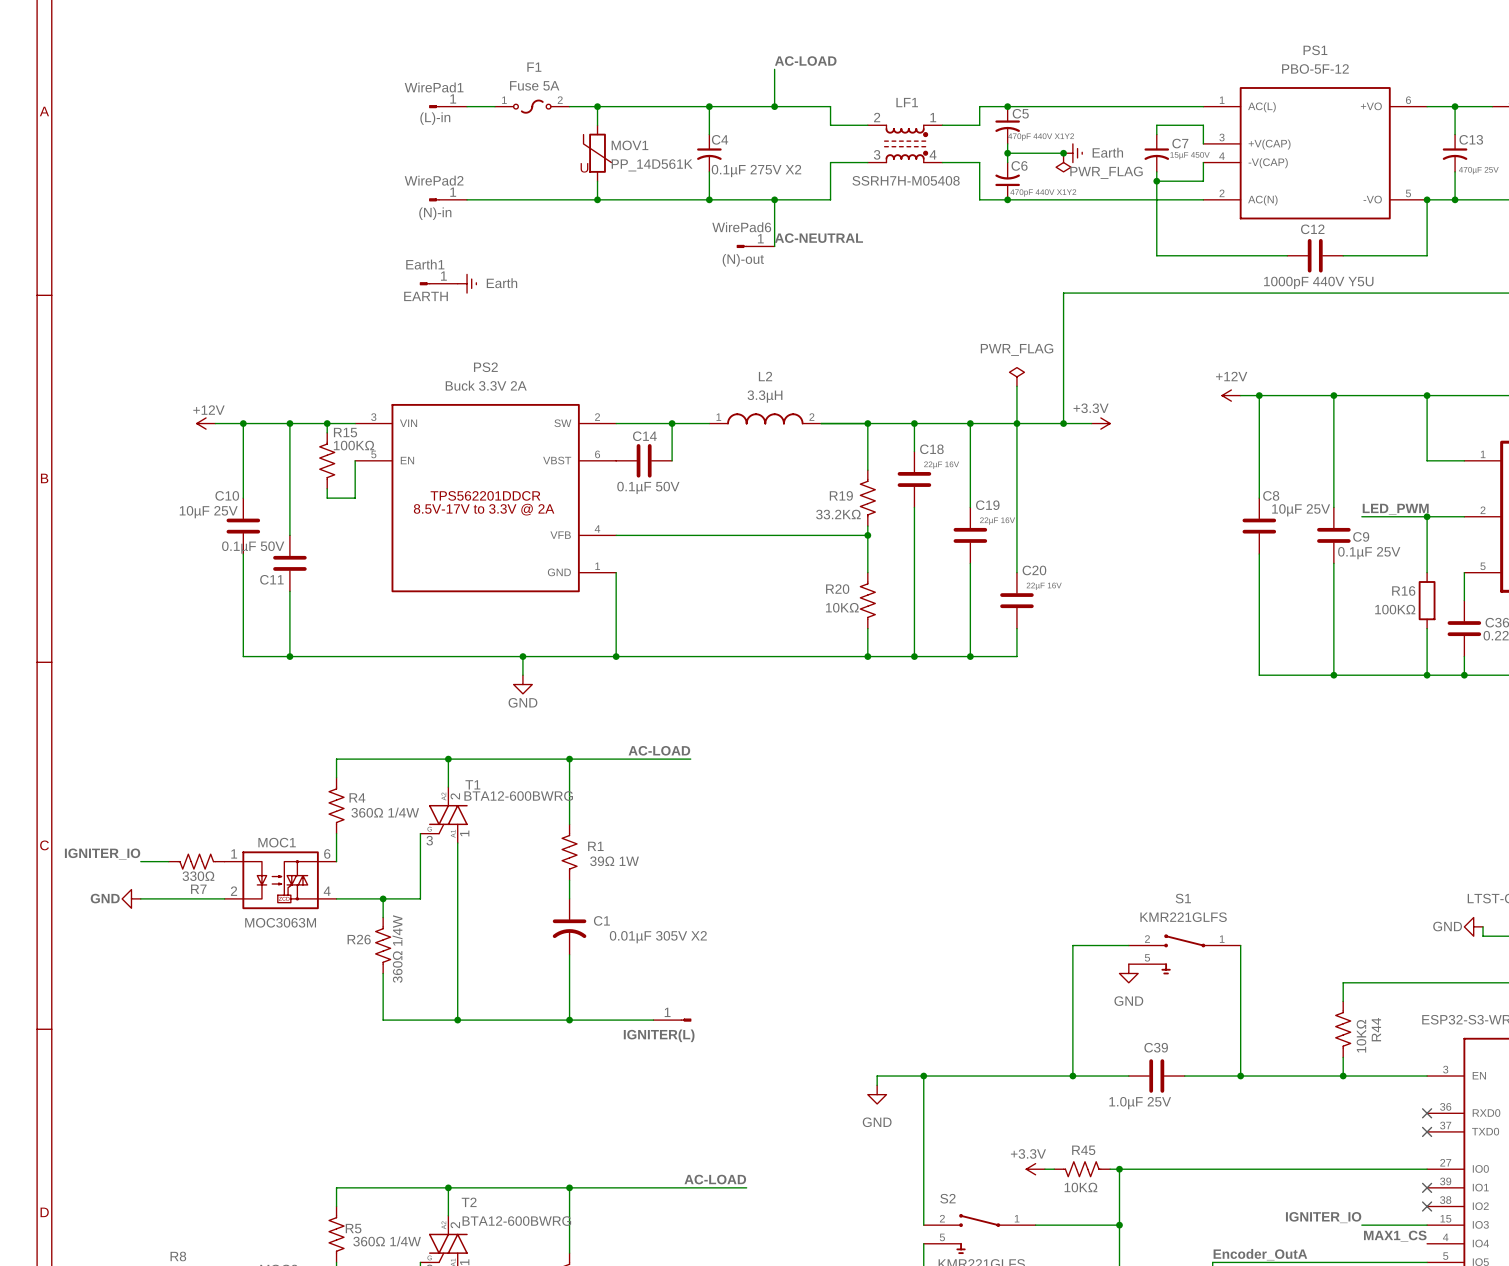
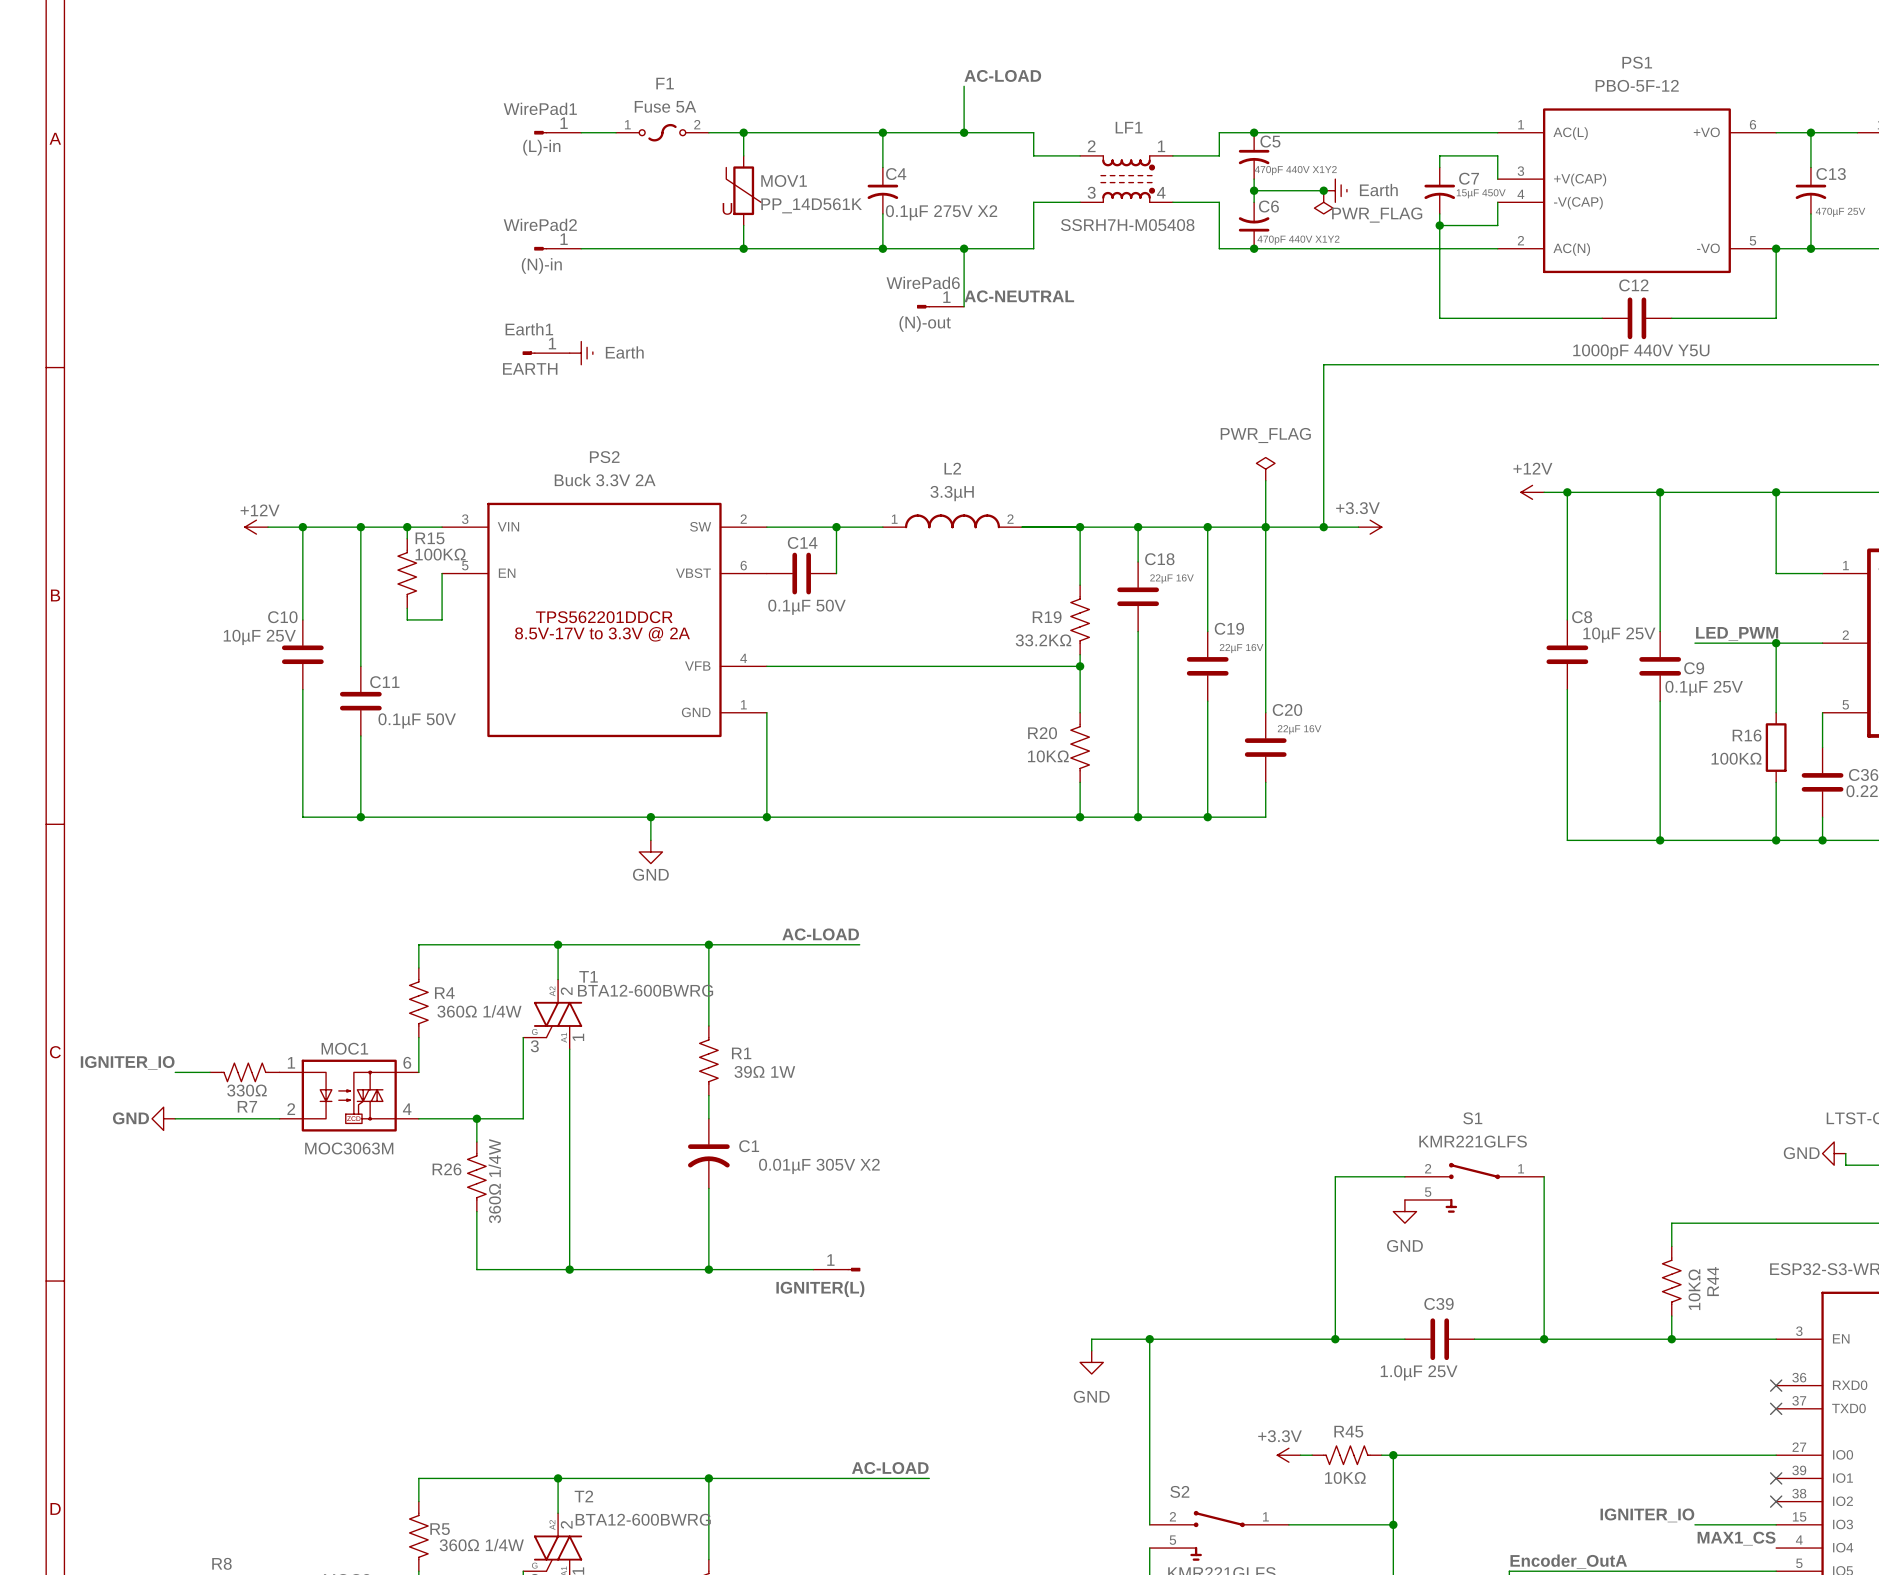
C11 value position: 0.1µF 50V (253, 547) -> 0.1µF 50V (417, 720)
C11 name position: C11 (271, 579) -> C11 (384, 682)

